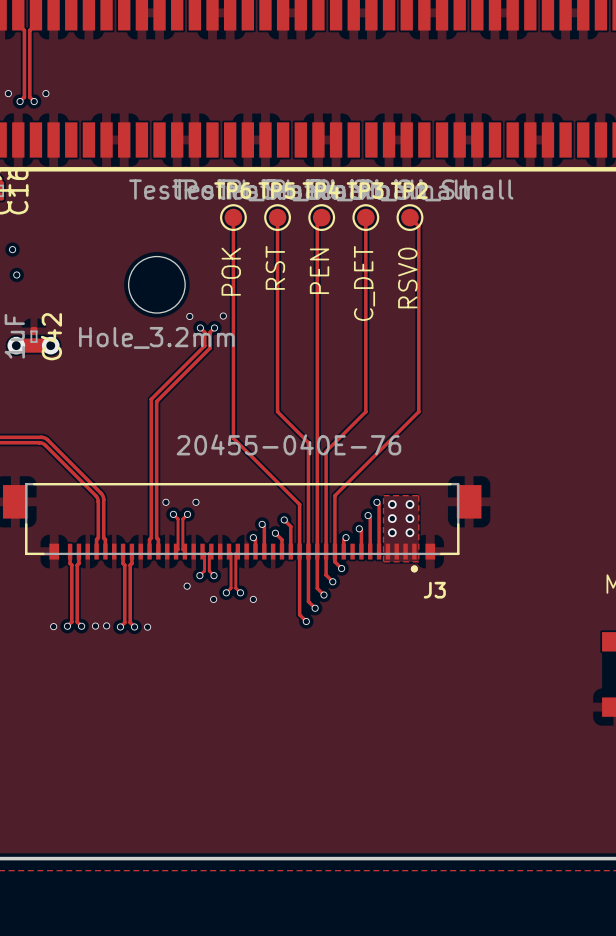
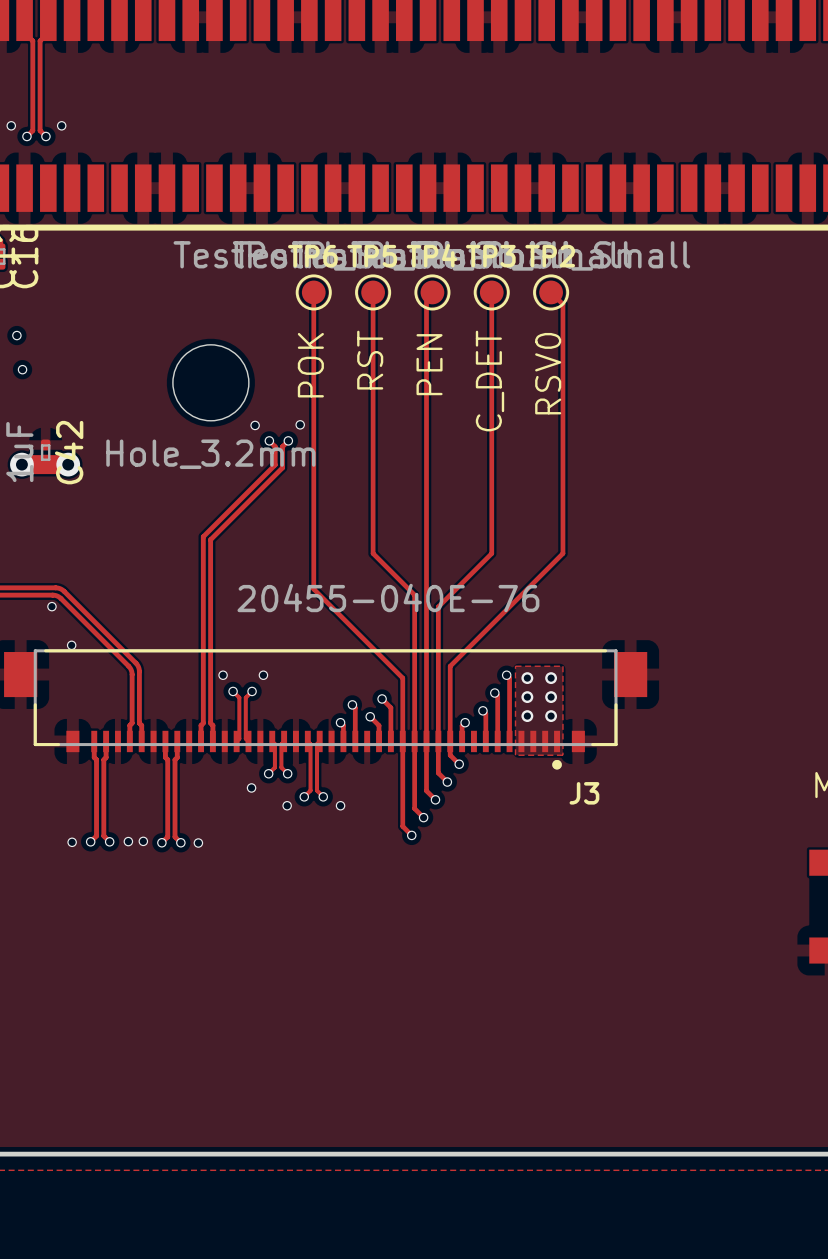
via: none -> (51, 606)
via: none -> (71, 645)

